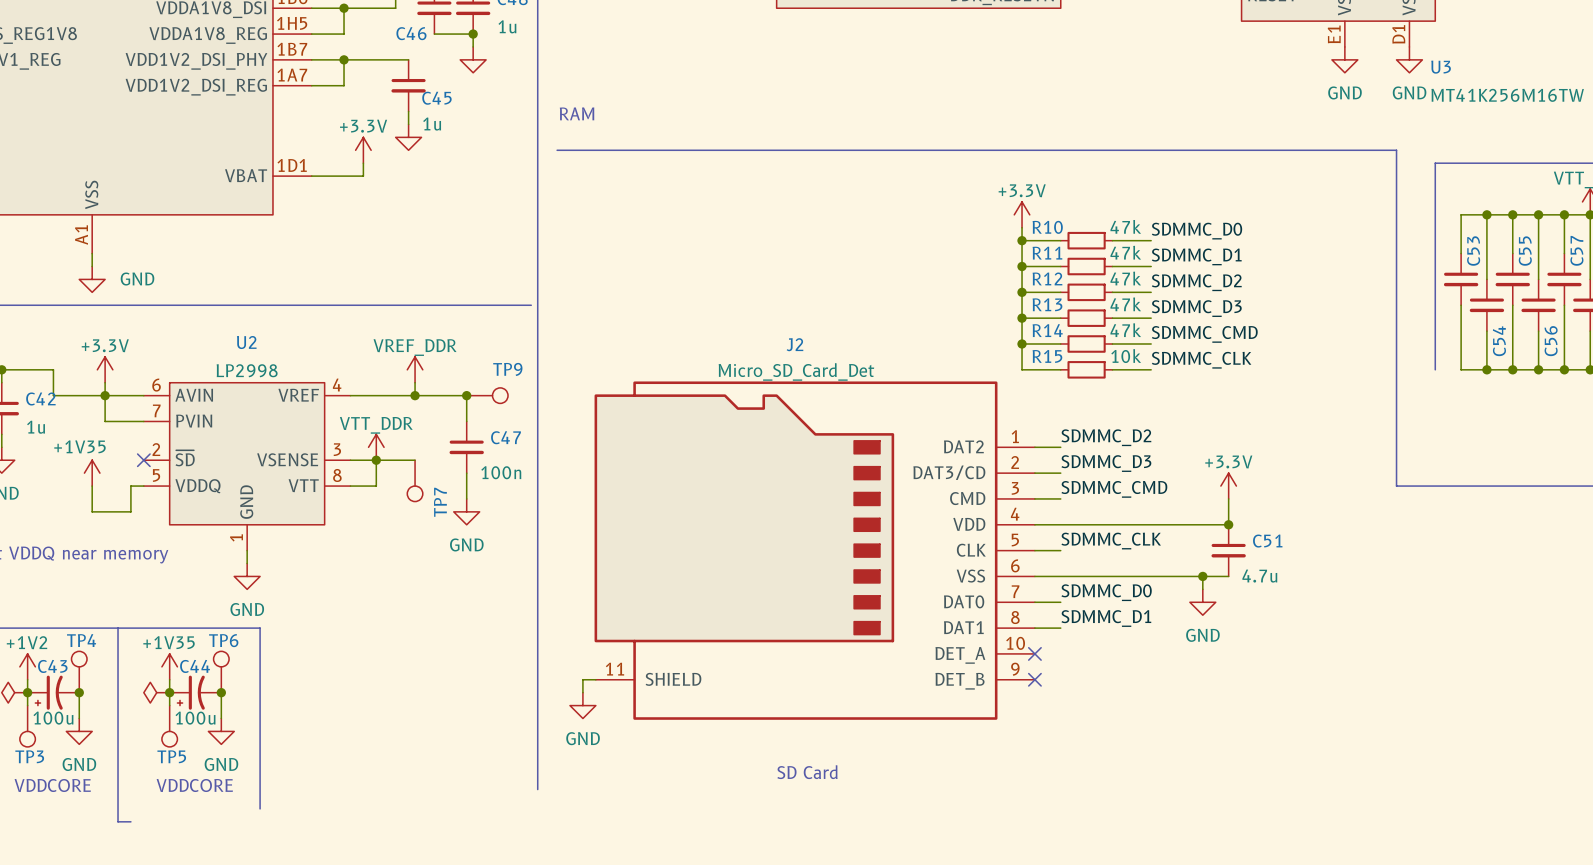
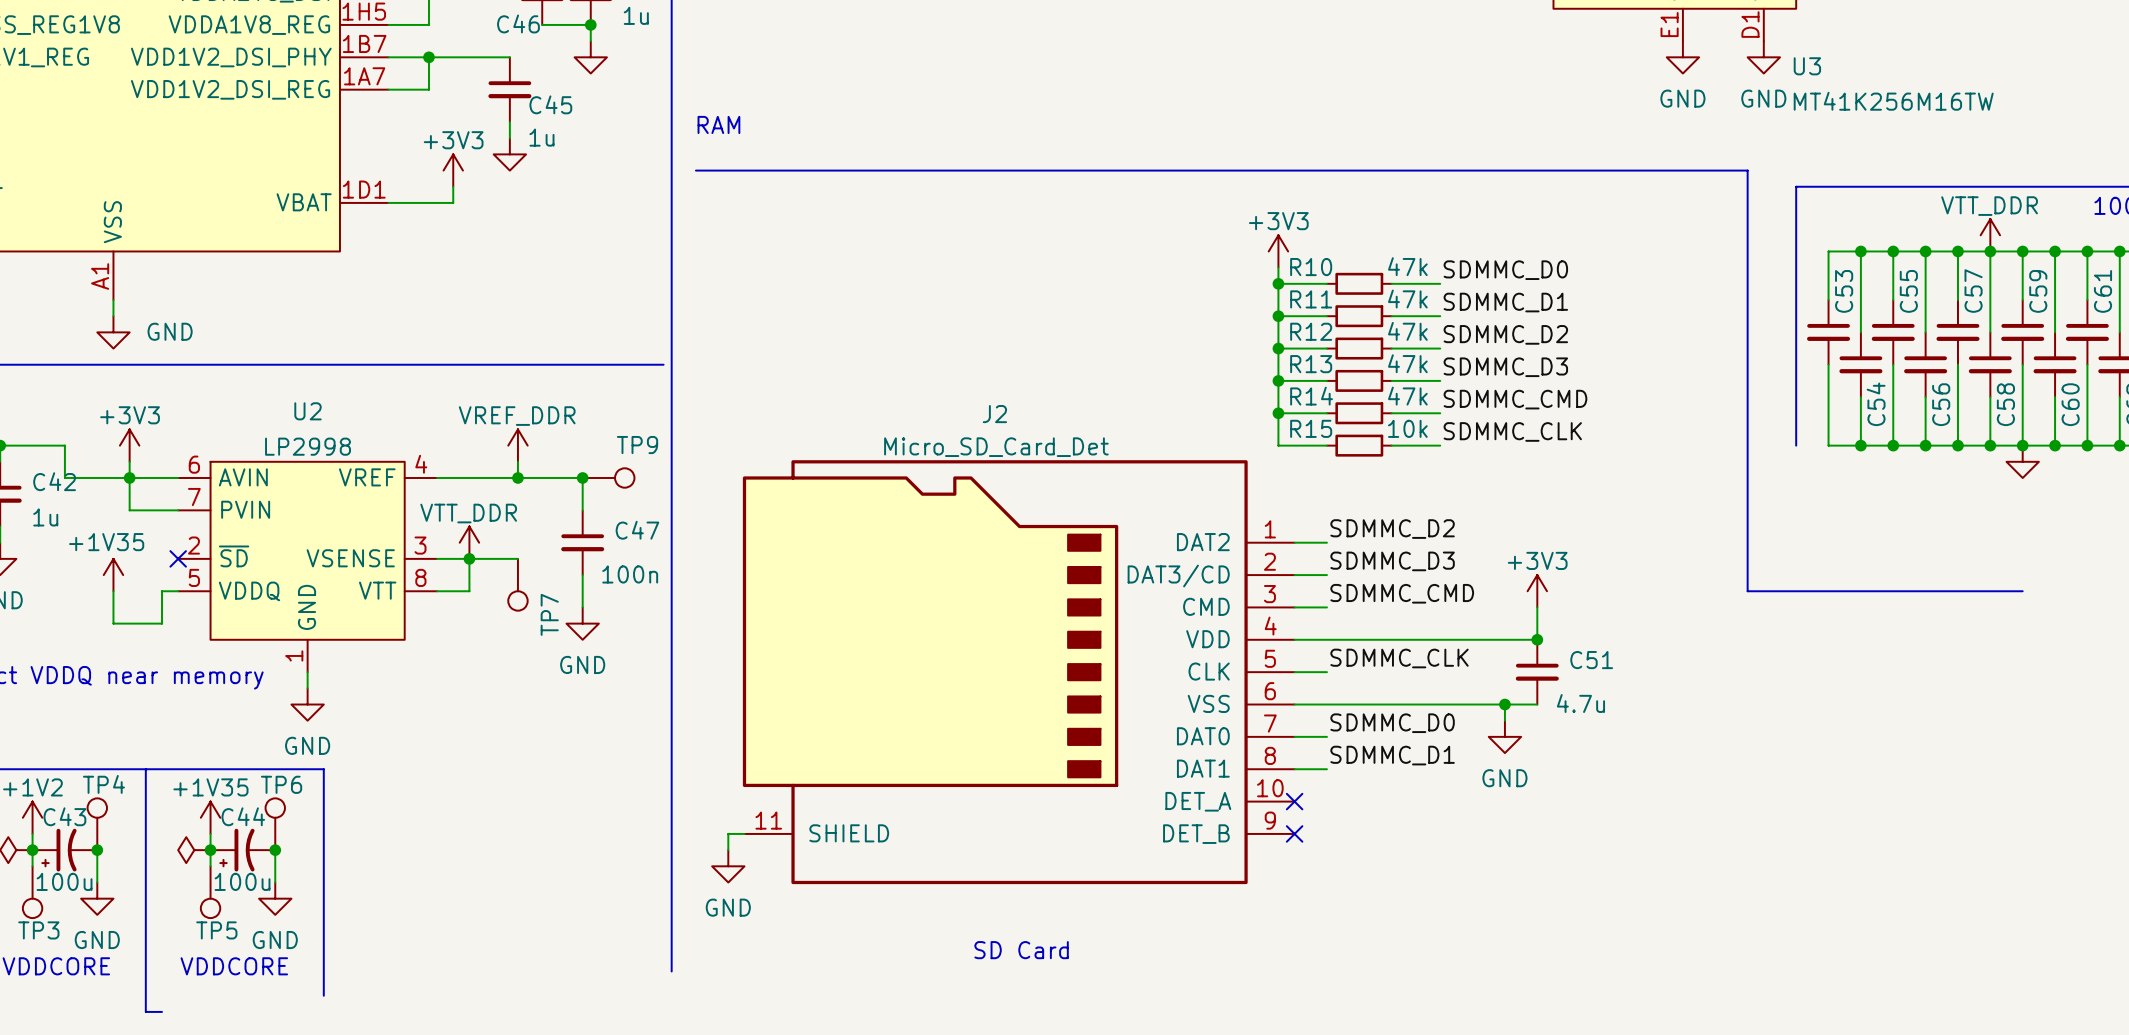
power symbol: +3.3V (363, 150) -> +3V3 (453, 170)
power symbol: +3.3V (1022, 214) -> +3V3 (1278, 251)
power symbol: +3.3V (105, 369) -> +3V3 (129, 445)
power symbol: +3.3V (1228, 486) -> +3V3 (1537, 591)

